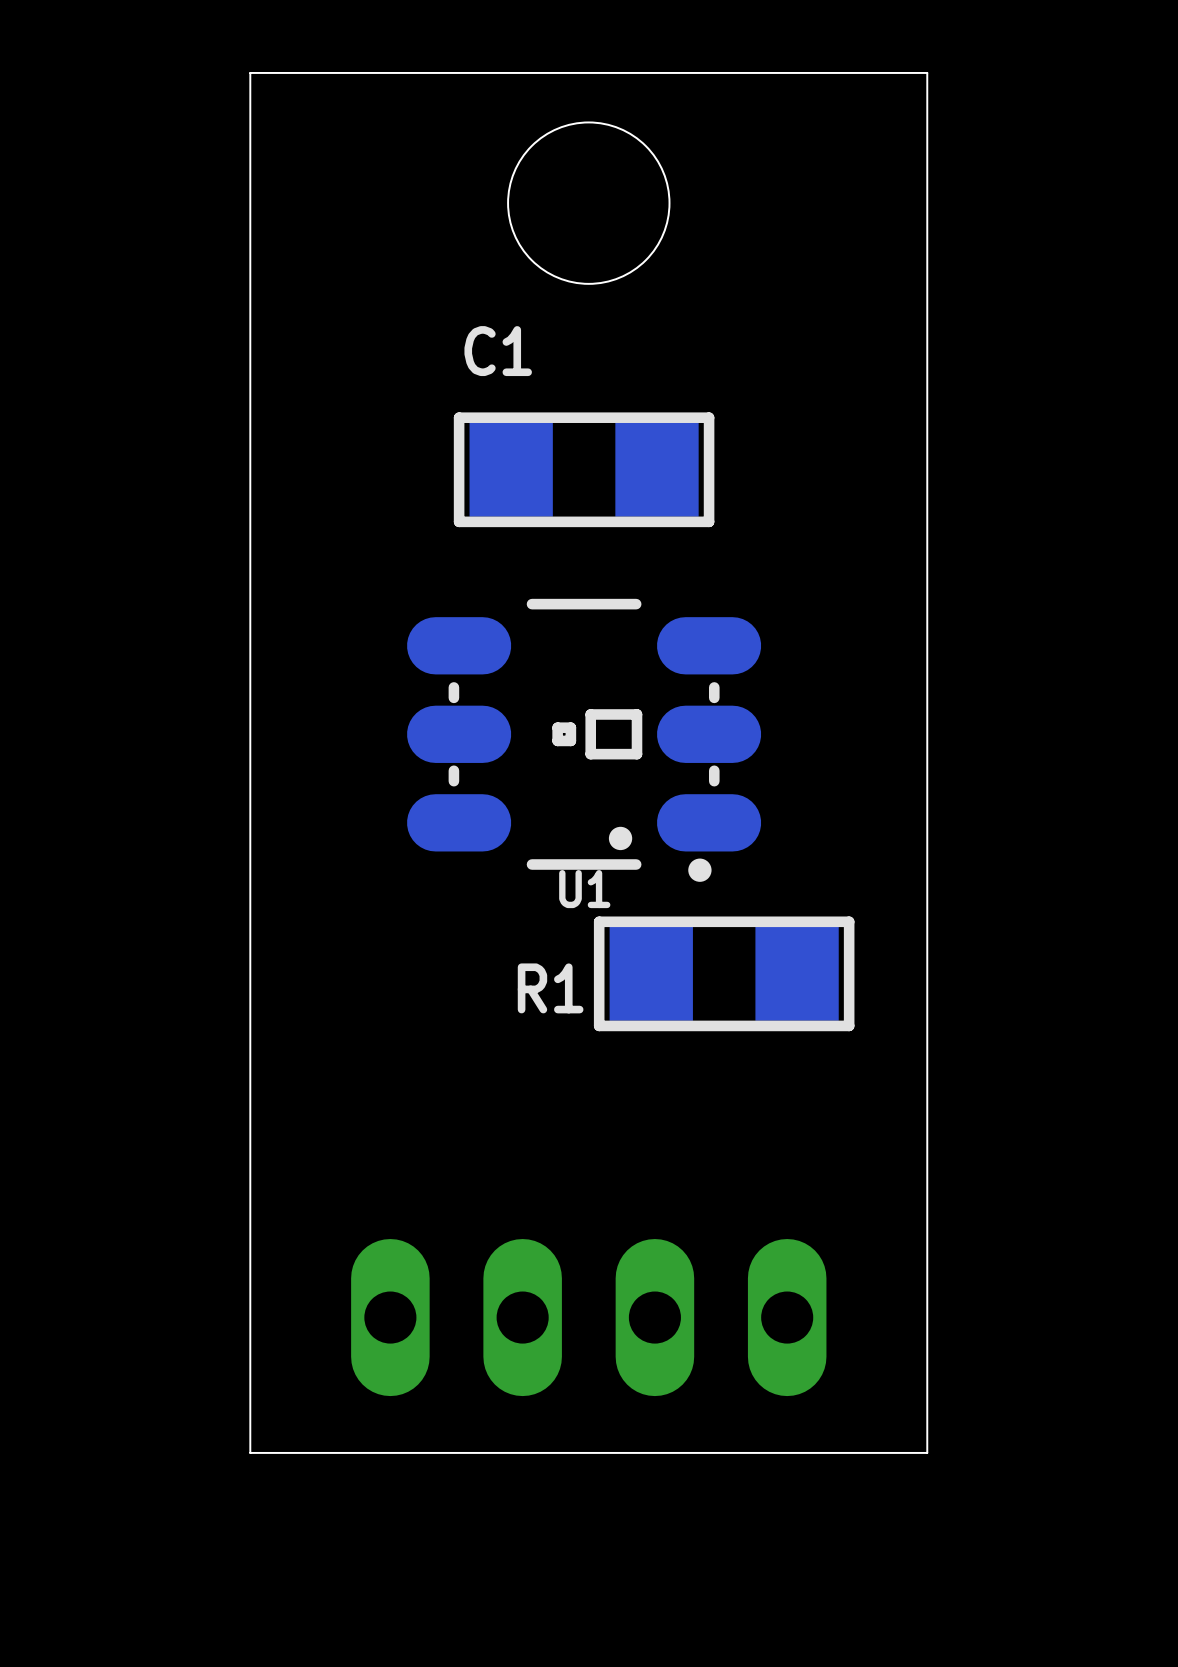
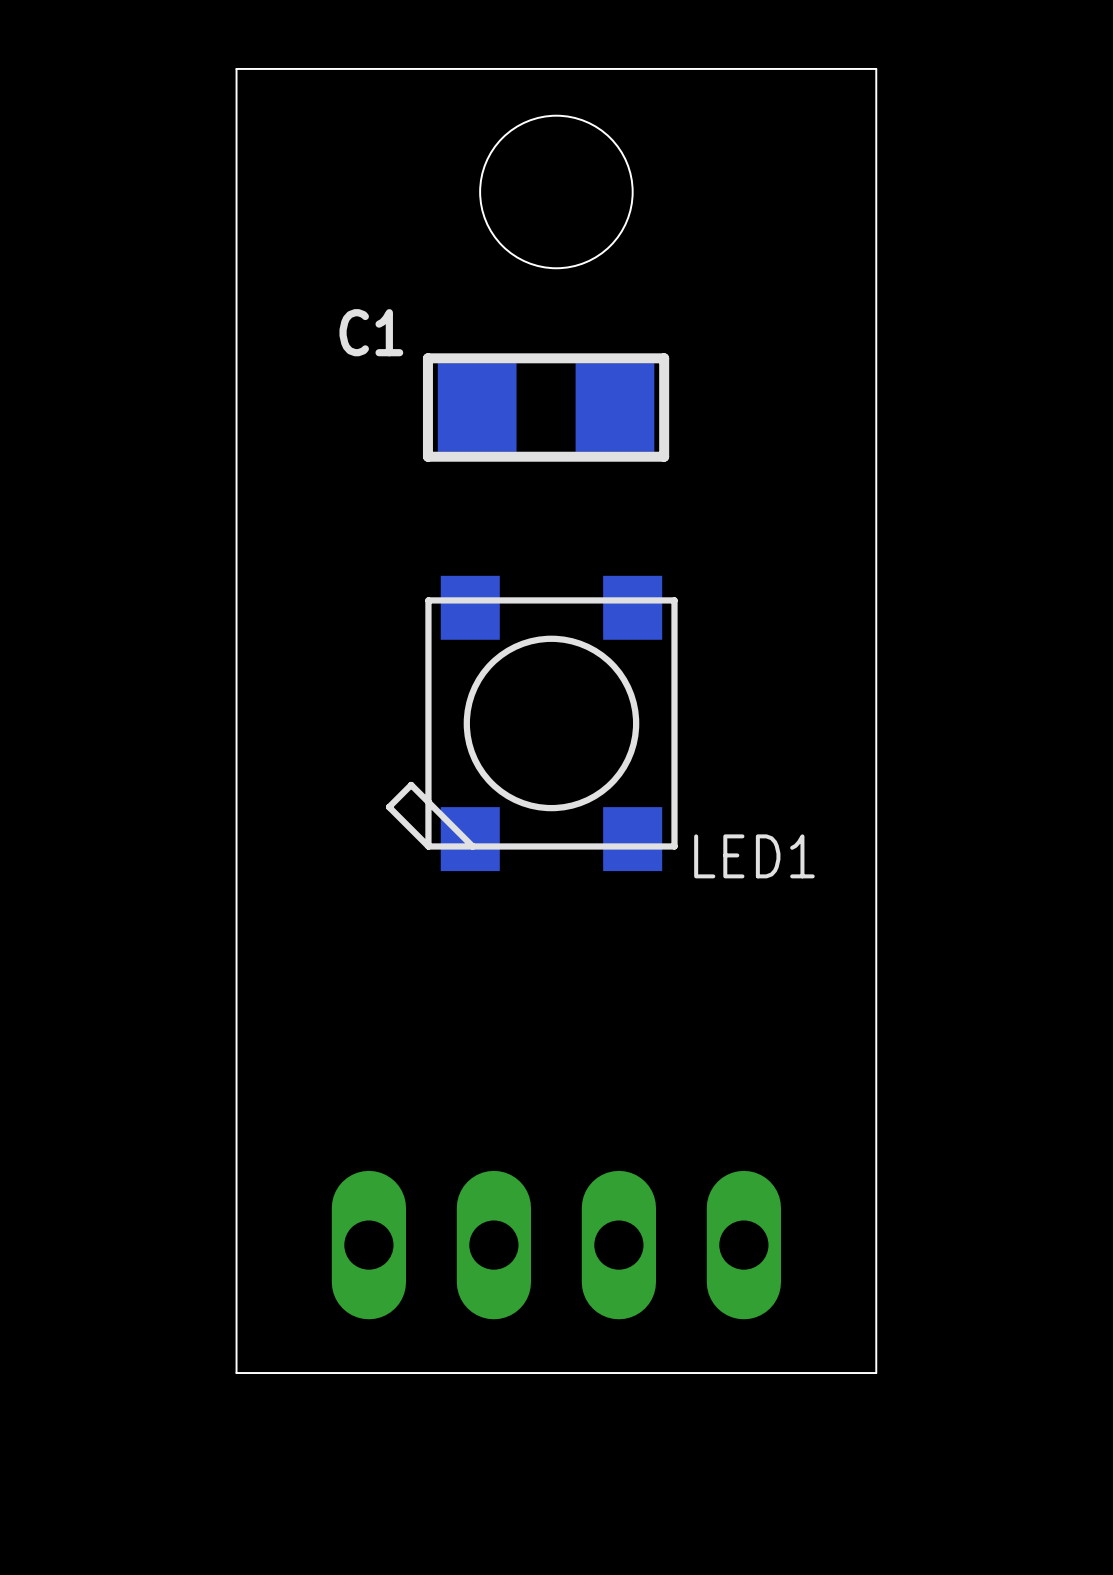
C1 name position: C1 (498, 351) -> C1 (371, 332)
C1 position: (584, 469) -> (546, 407)
U1: (584, 740) -> none
LED1: none -> (531, 723)
R1: (724, 973) -> none

